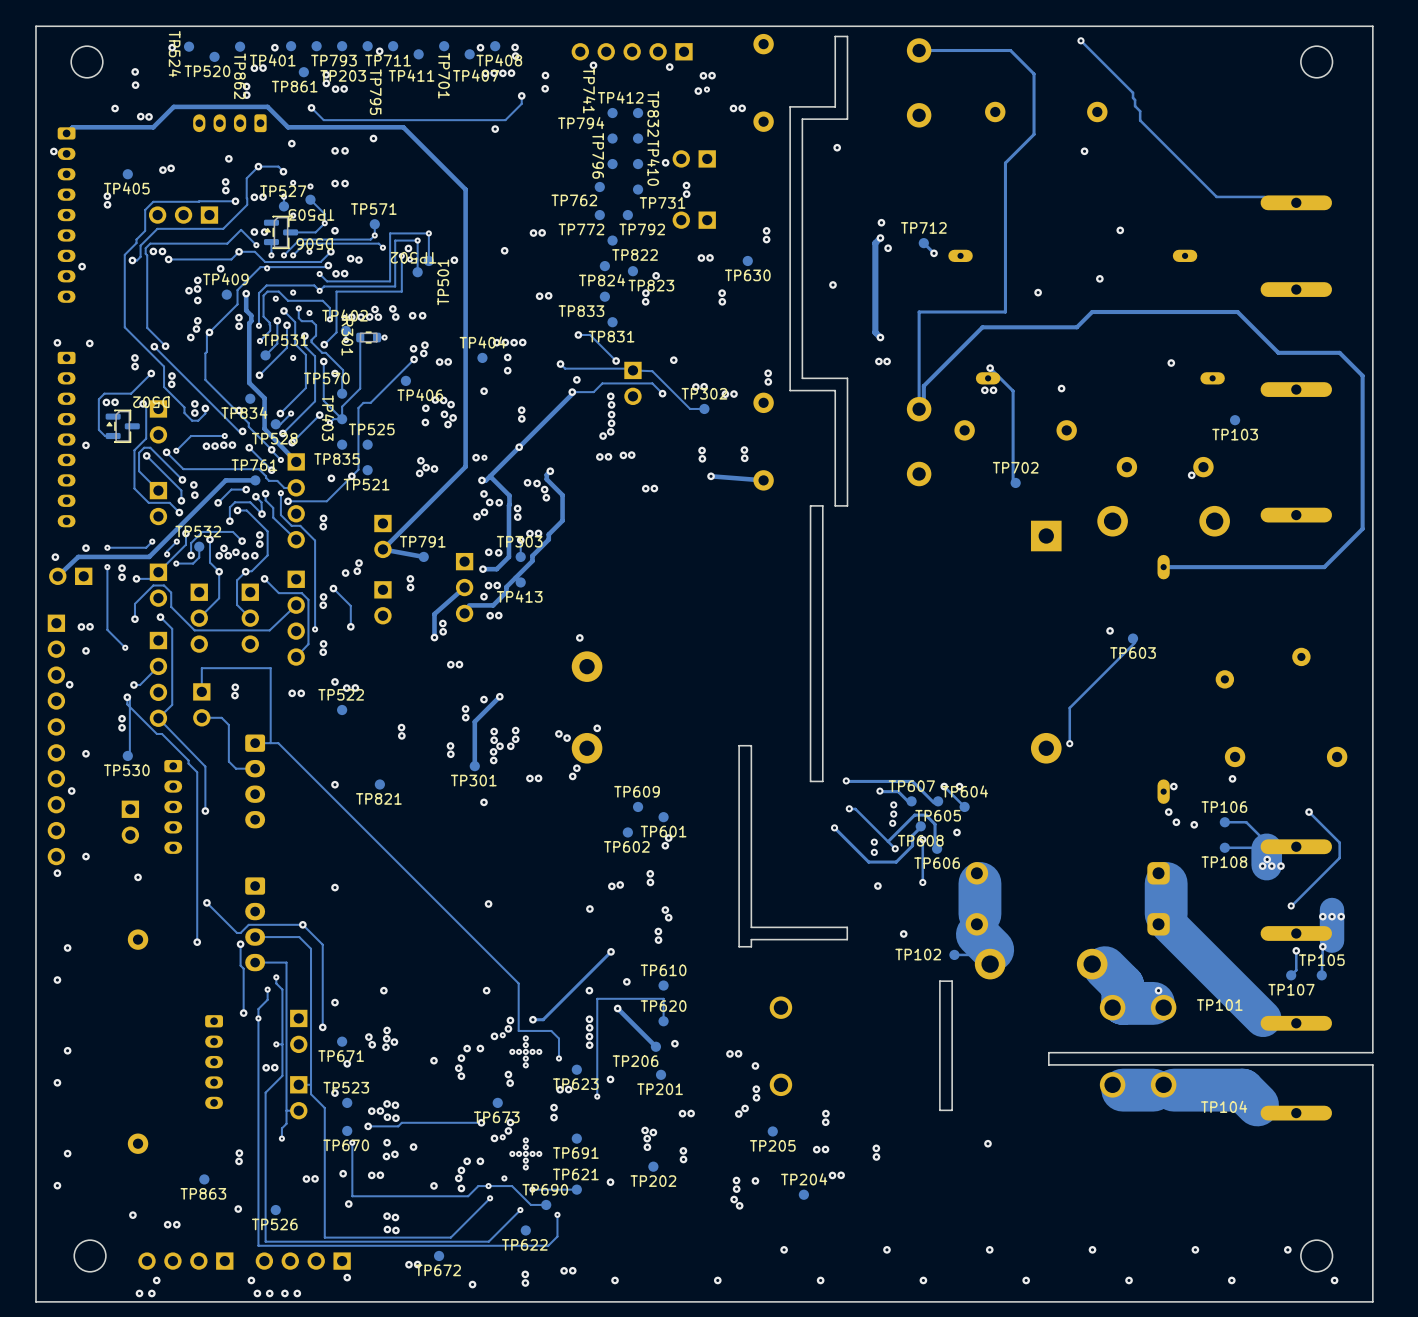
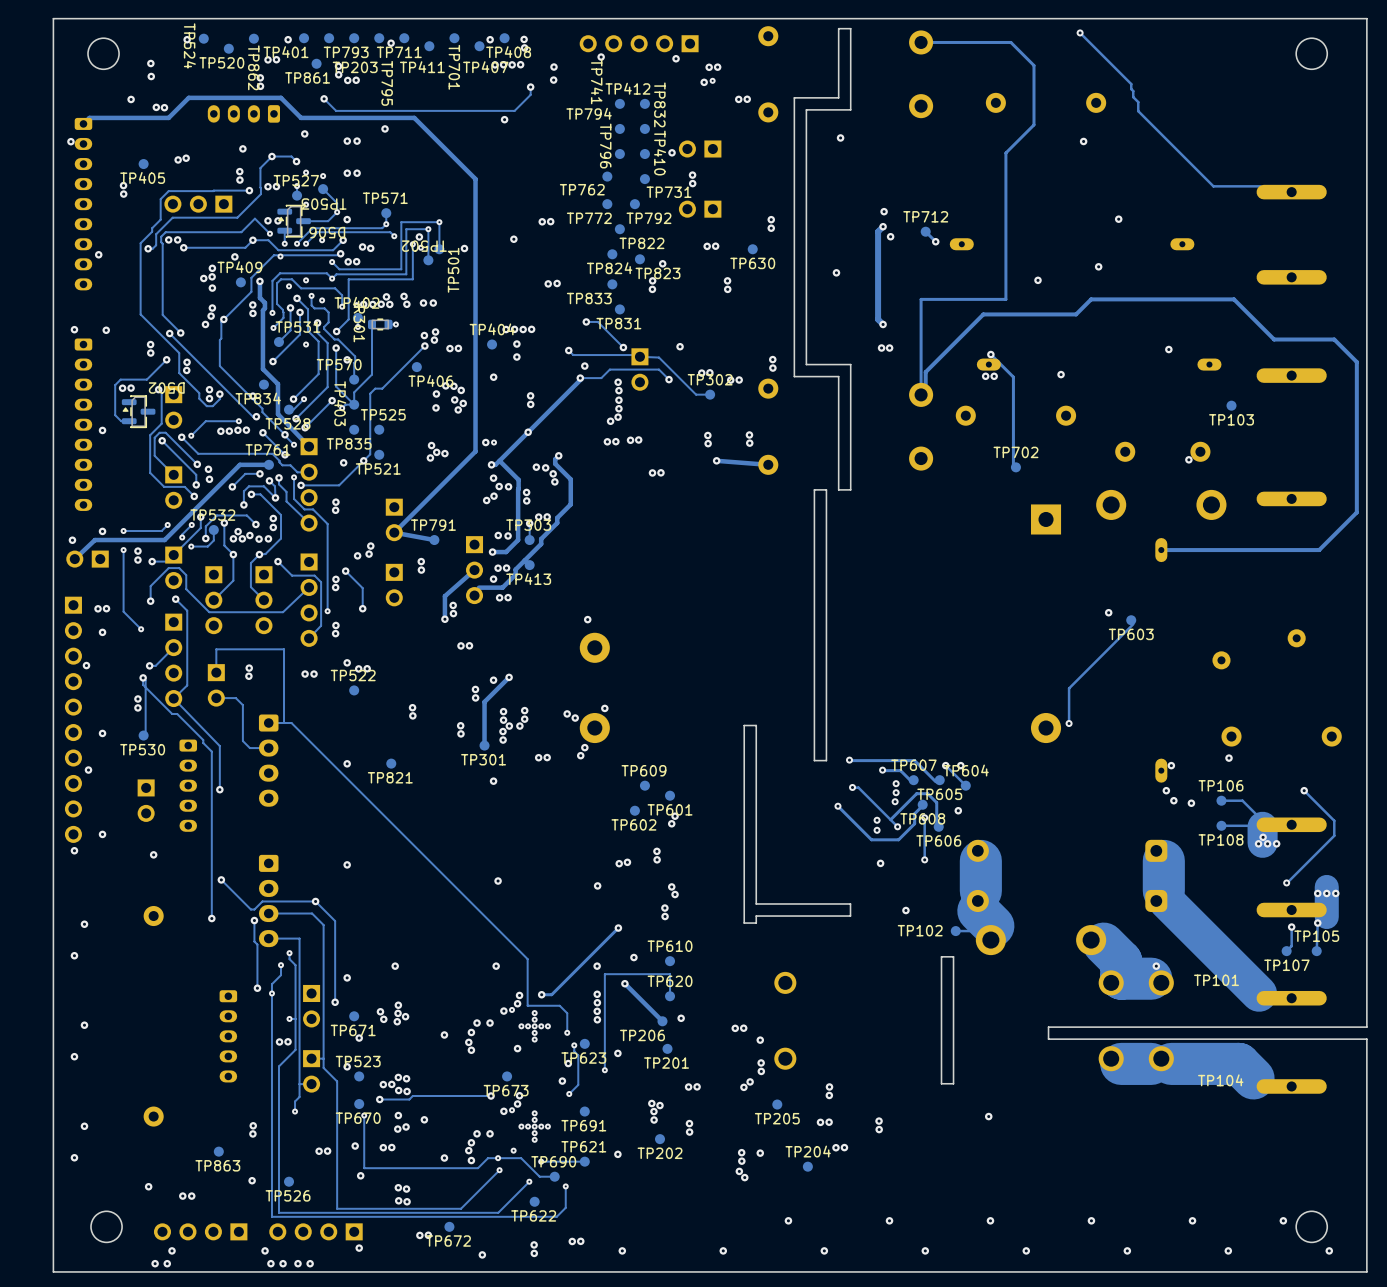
track: none -> (574, 1045) (574, 1051) (578, 1055) (578, 1084) (569, 1093)
via: none -> (574, 1045)
via: (510, 1083) -> none
via: (568, 1089) -> none
via: (554, 1117) -> none
via: none -> (569, 1093)

